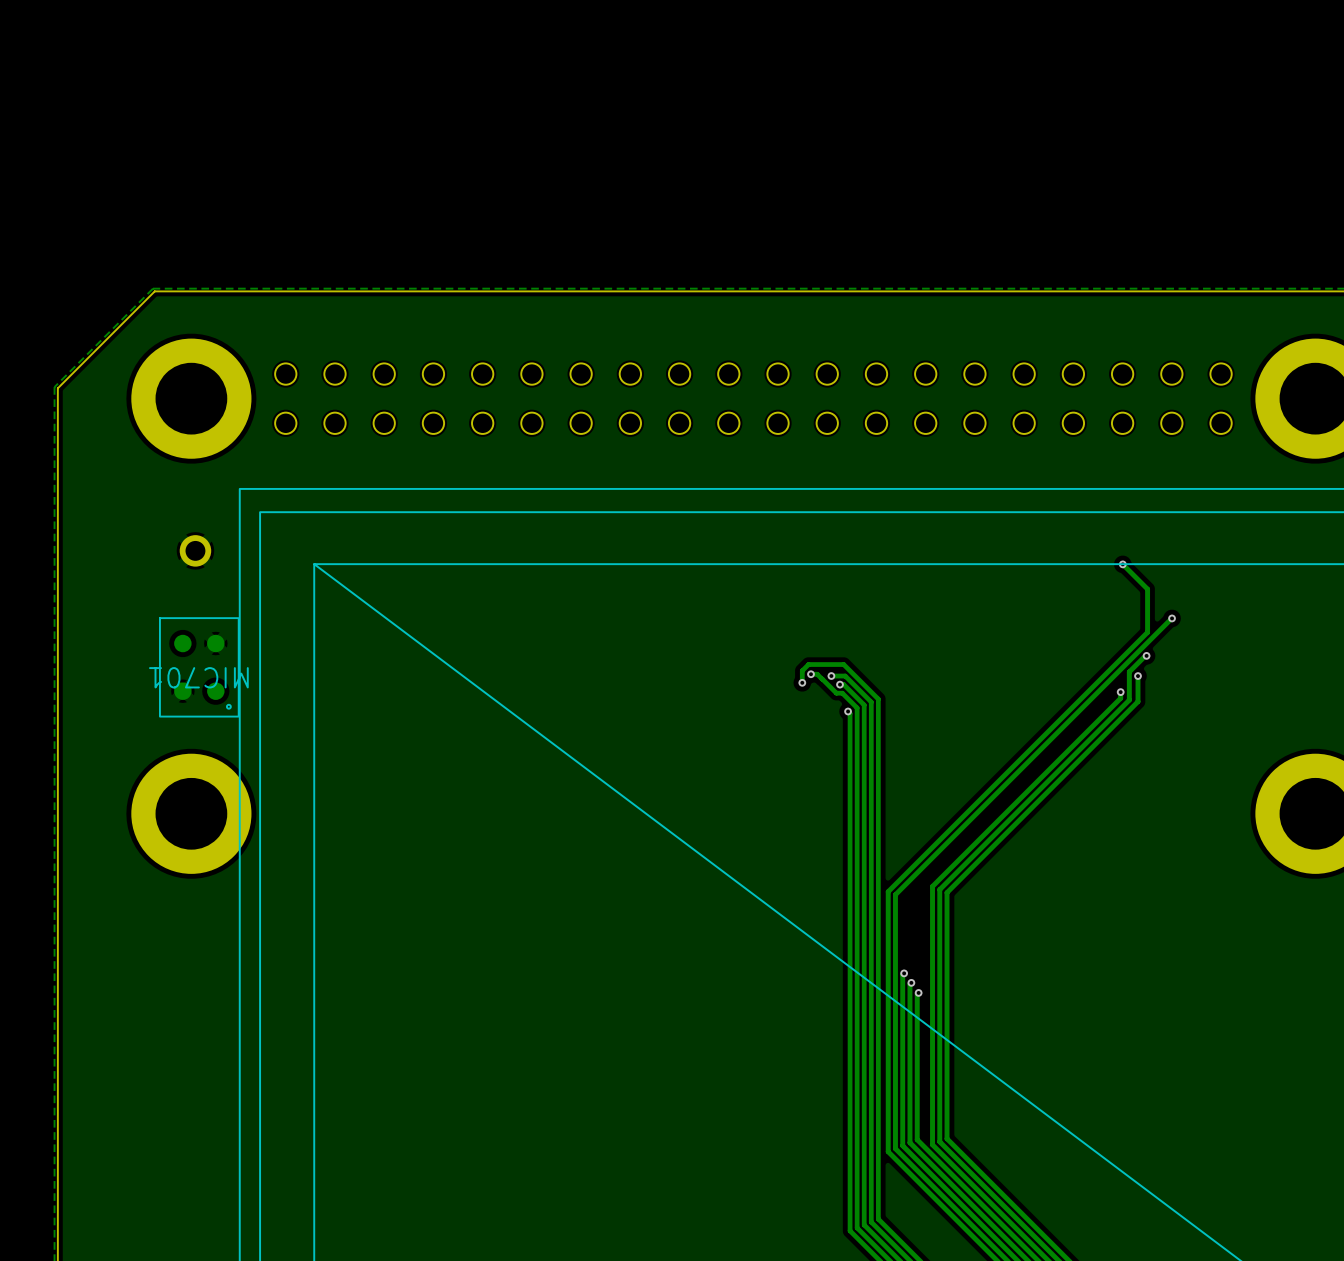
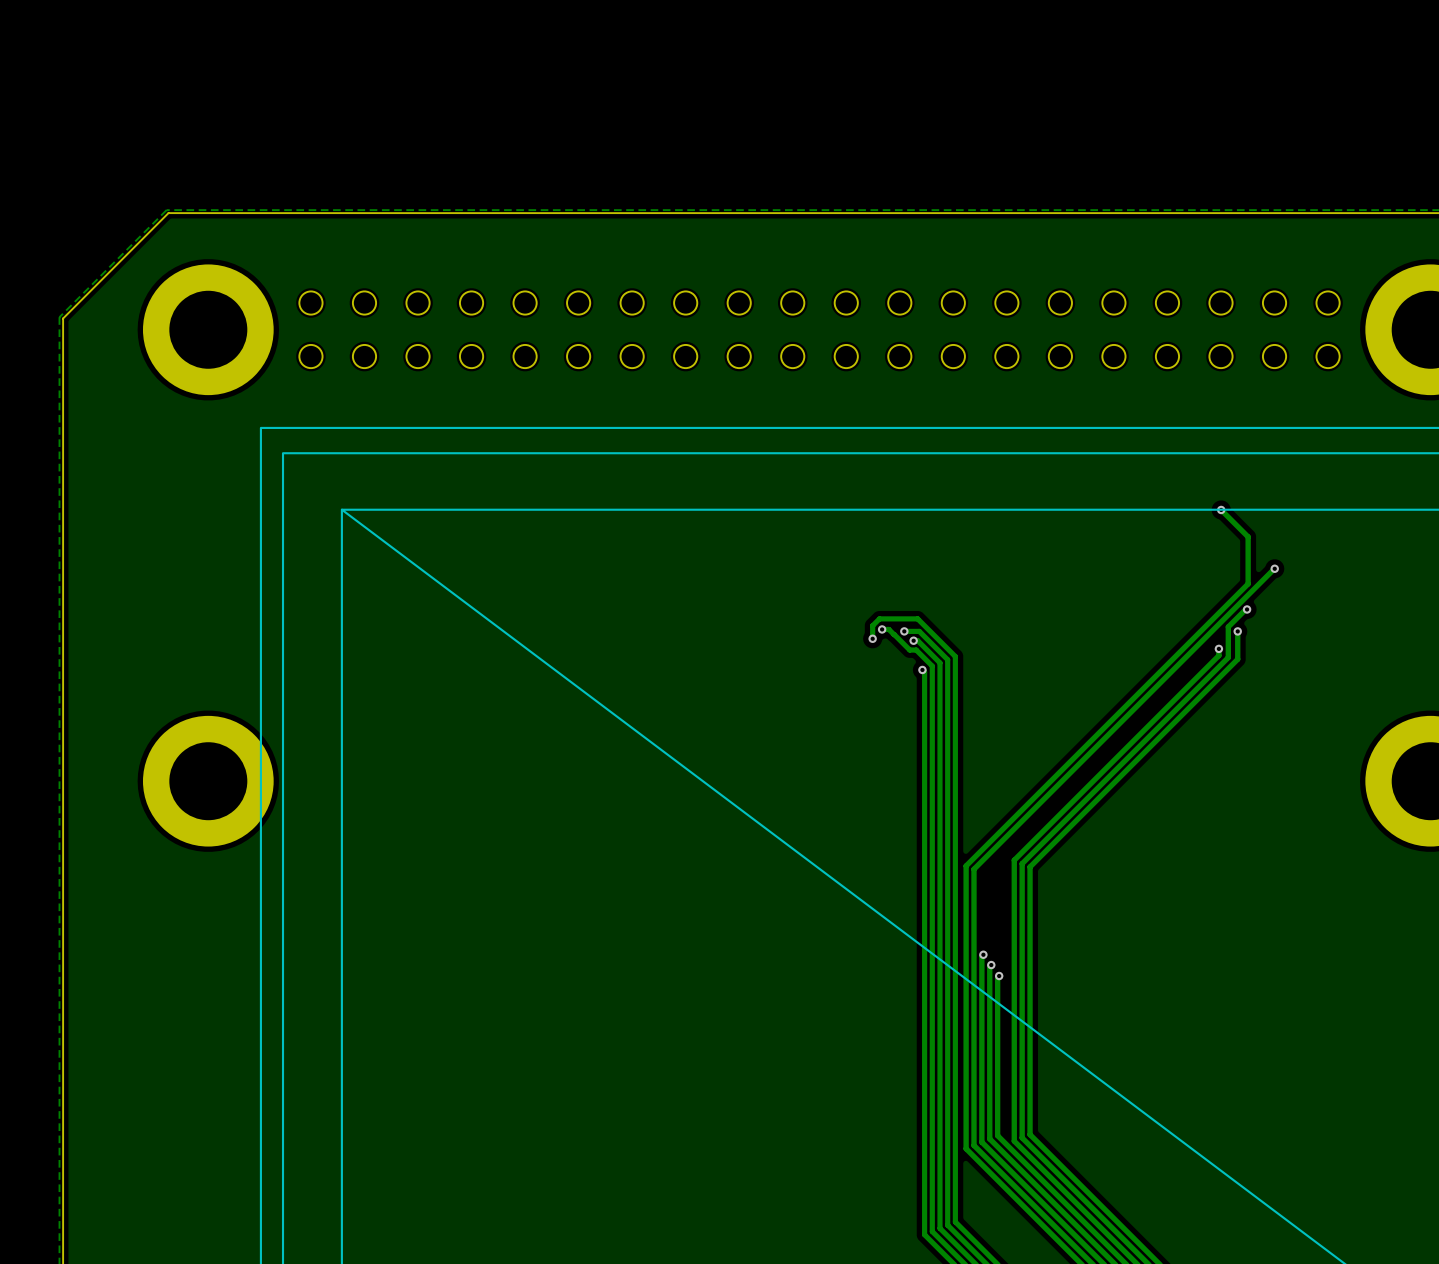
part: (195, 550) -> none
MIC701: (199, 667) -> none

